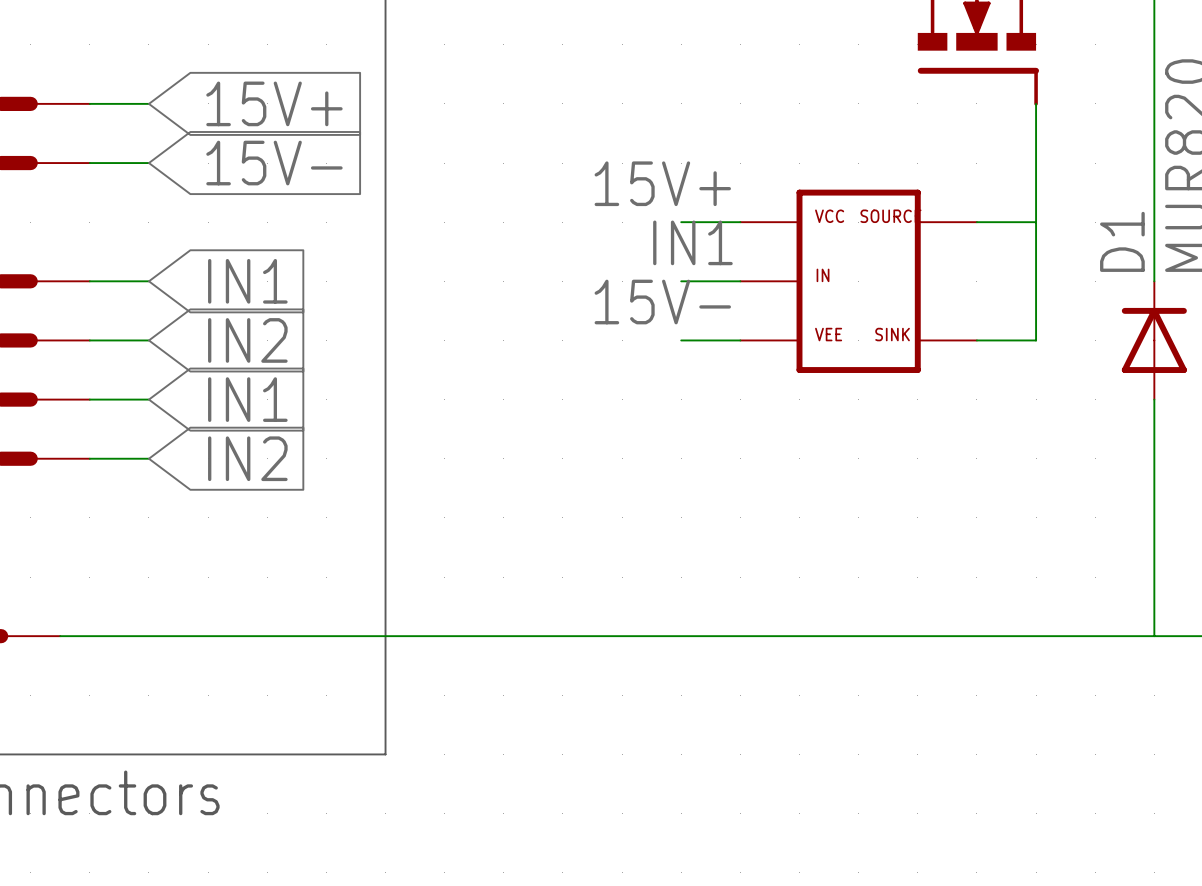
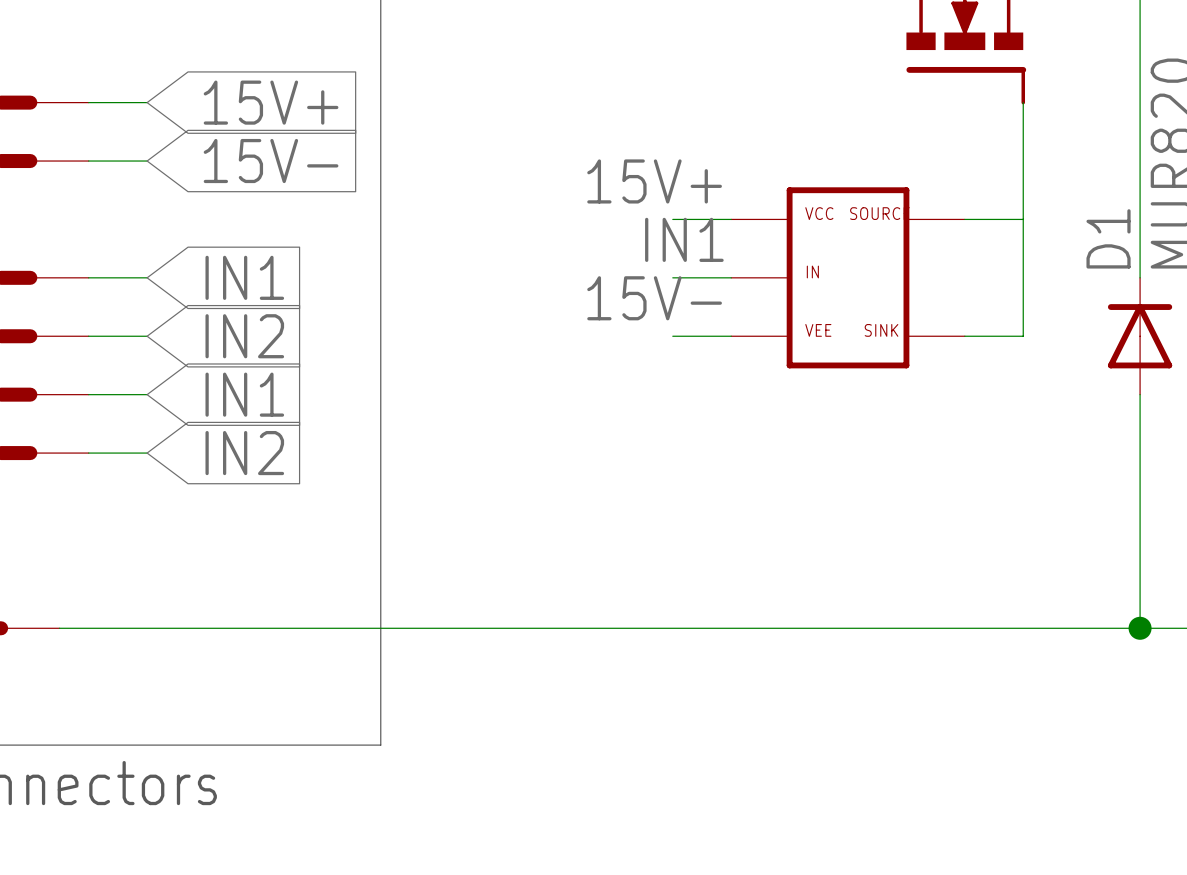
junction: none -> (1140, 628)

